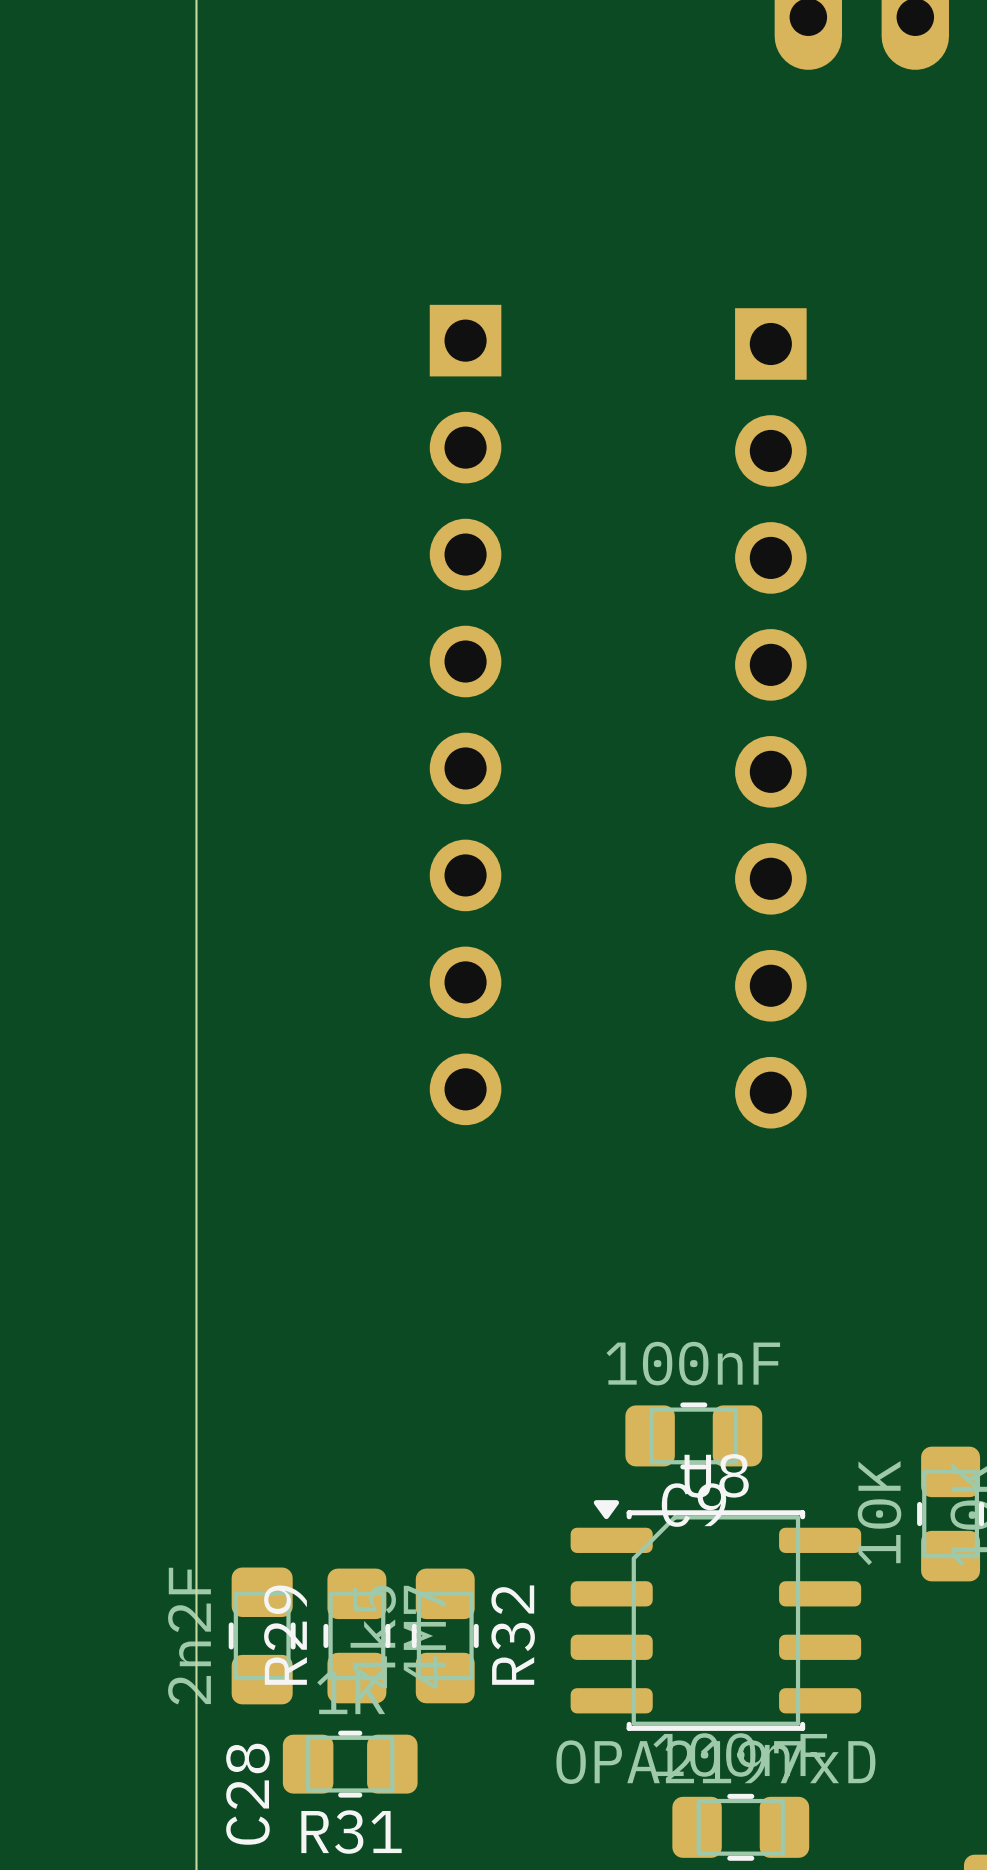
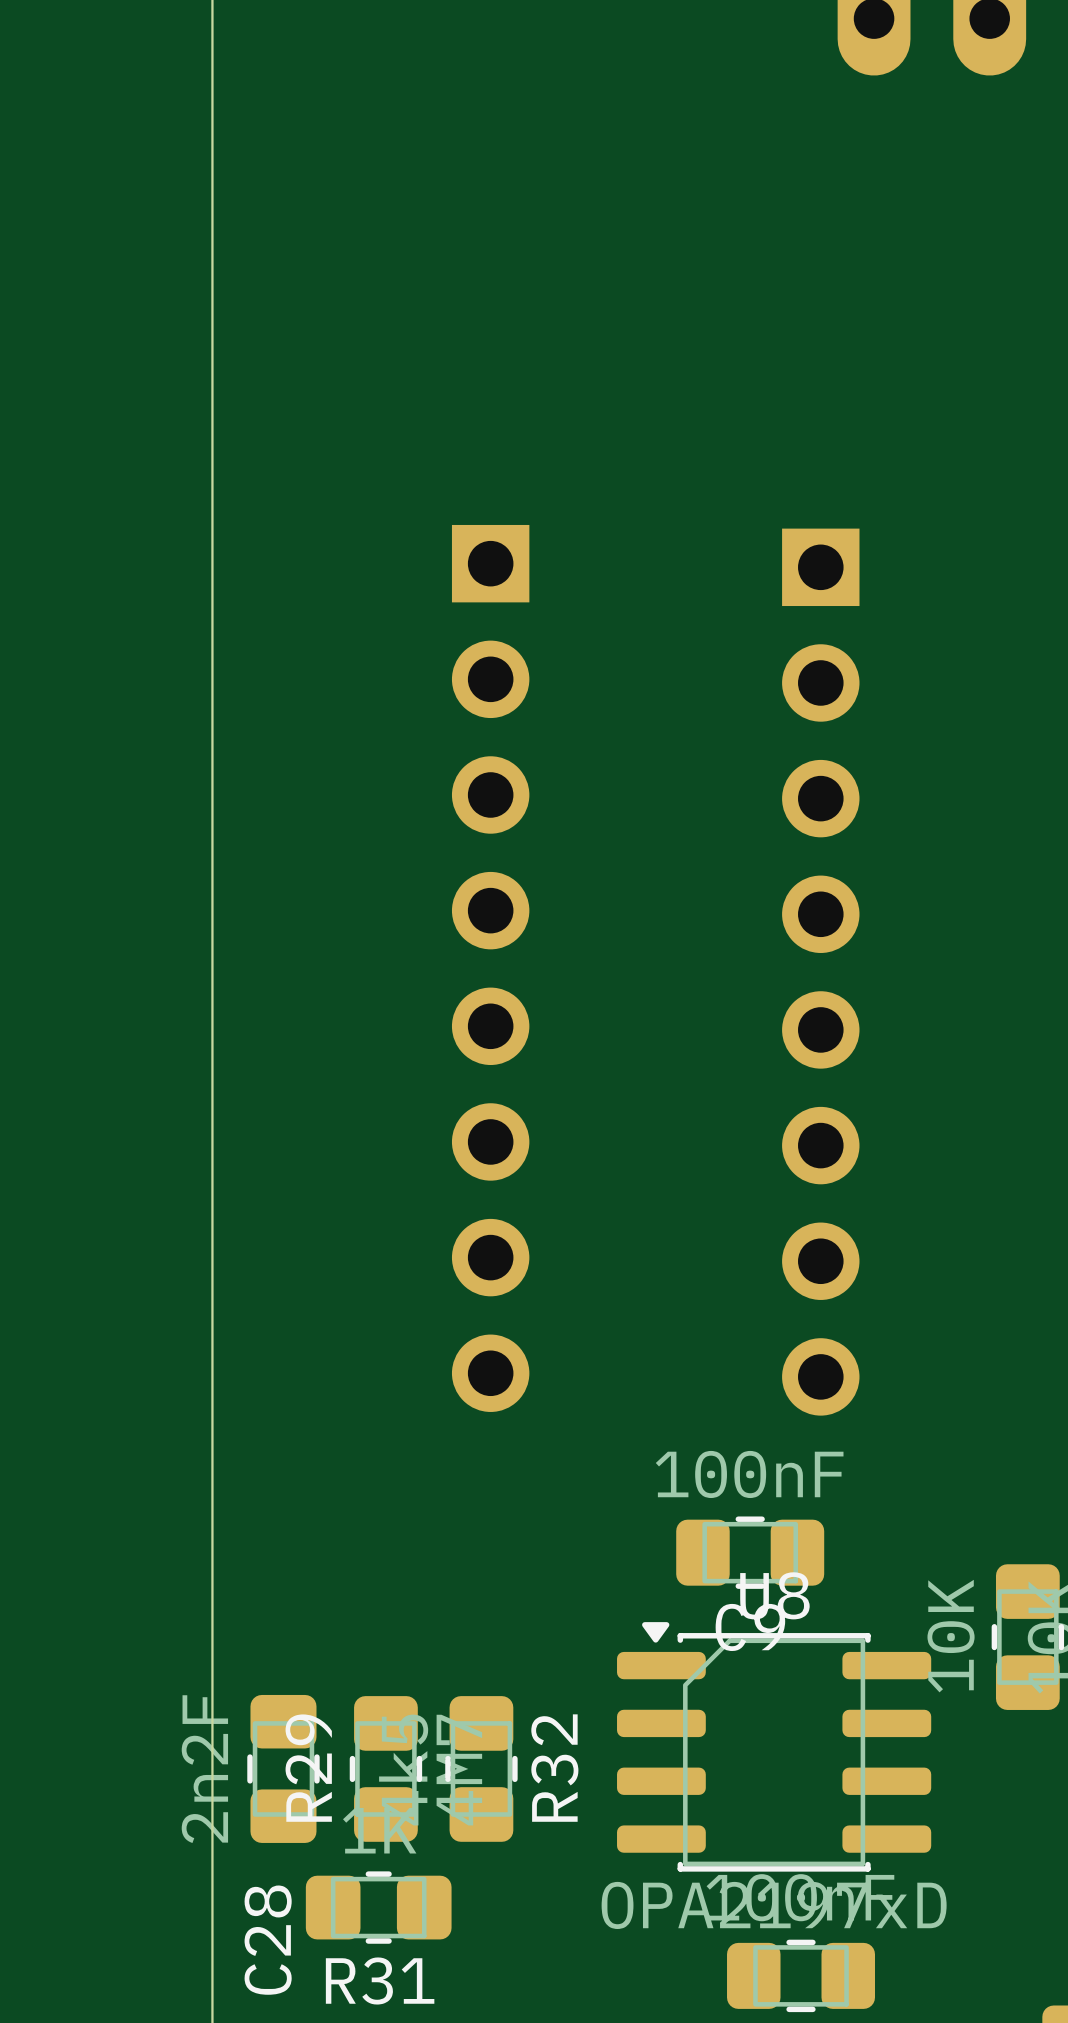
part: (465, 714) -> none
part: (770, 718) -> none
part: none -> (490, 968)
part: none -> (820, 972)

